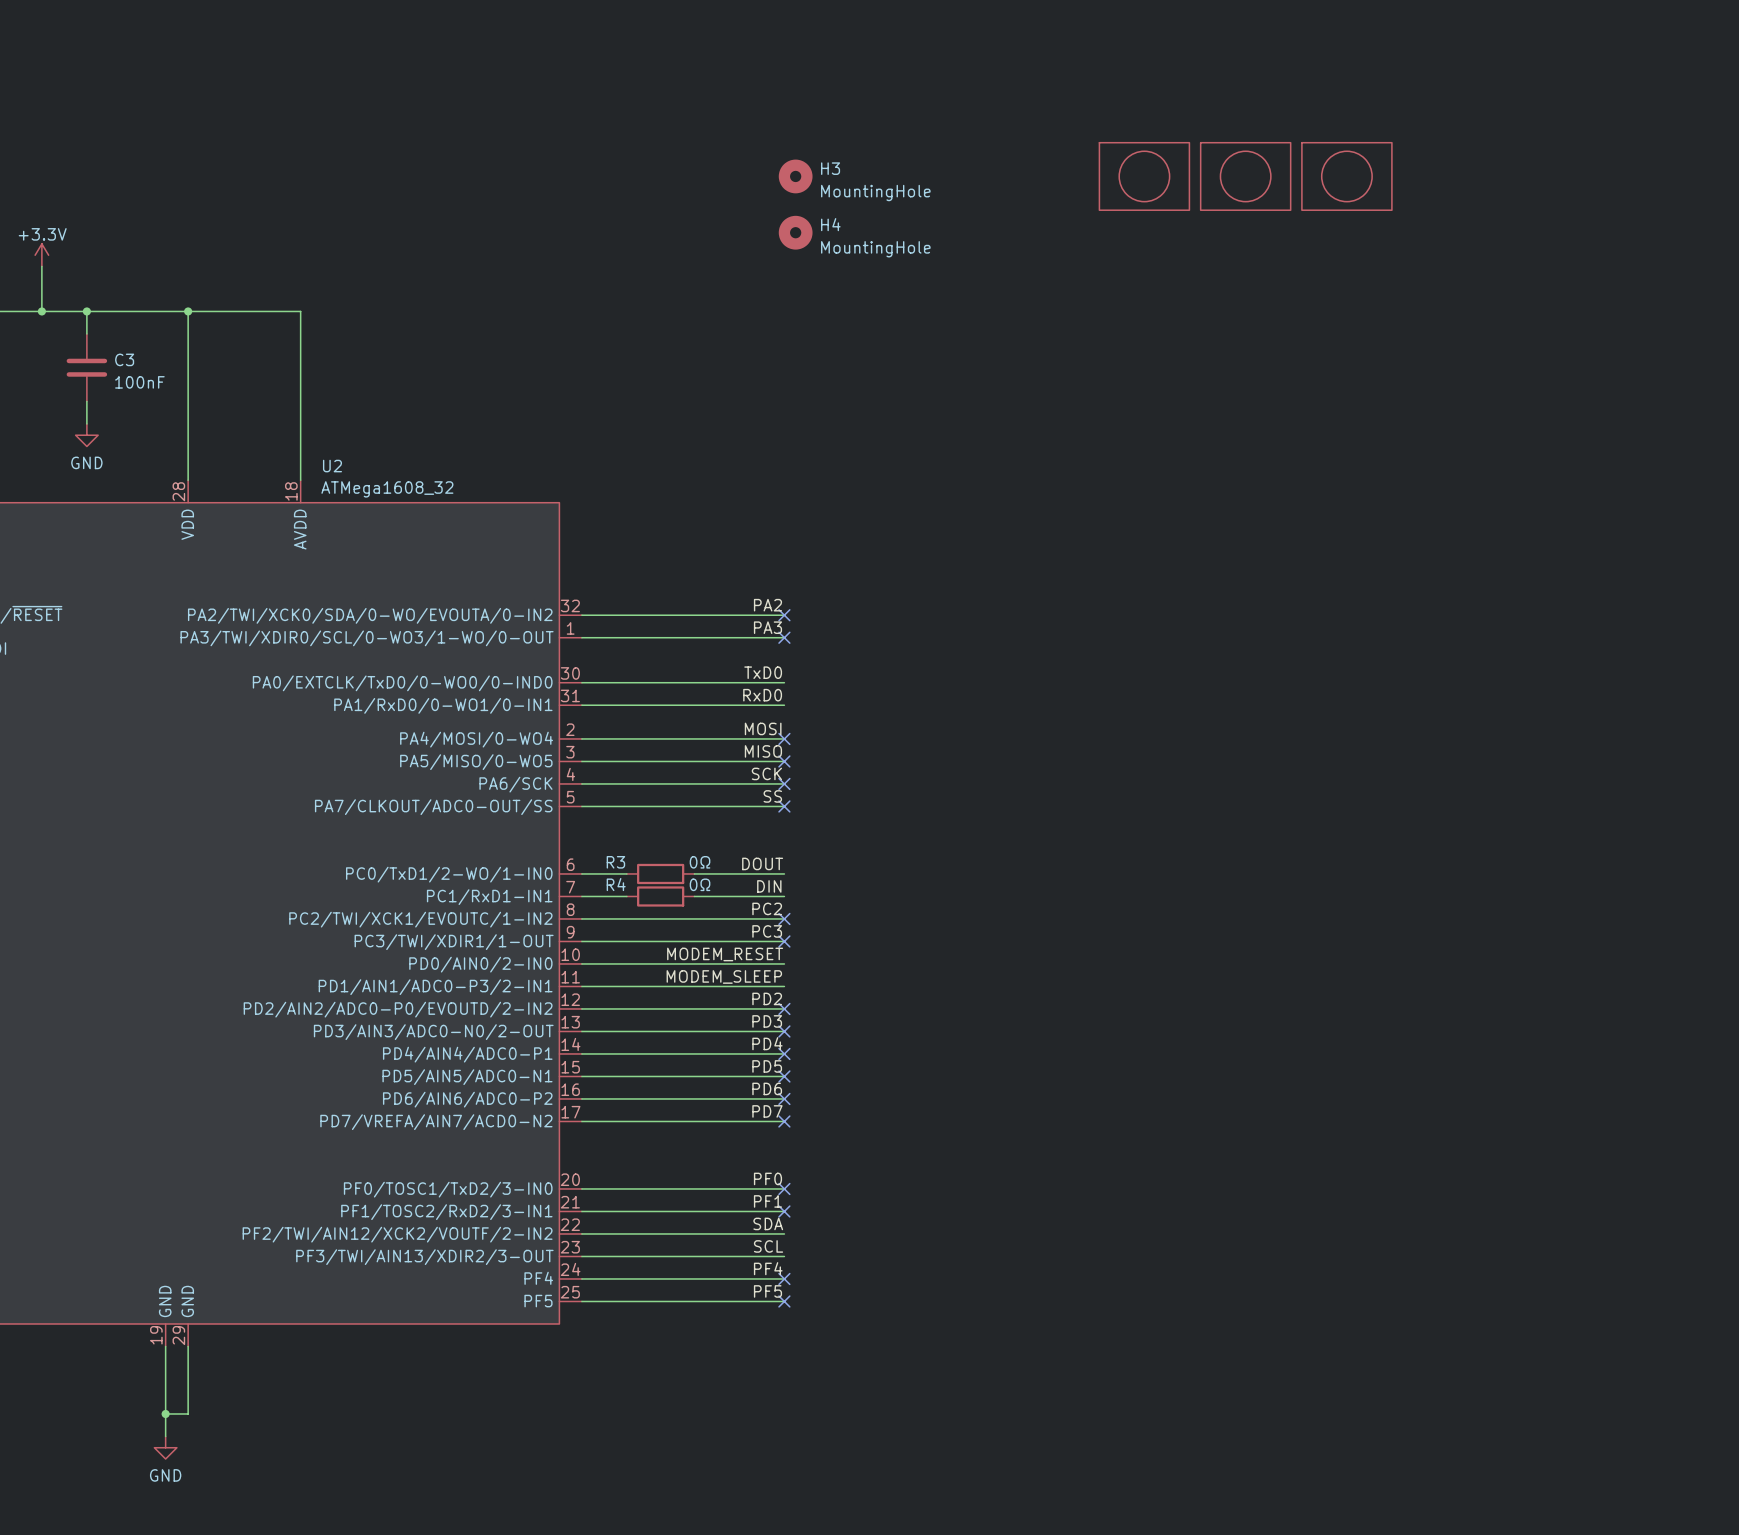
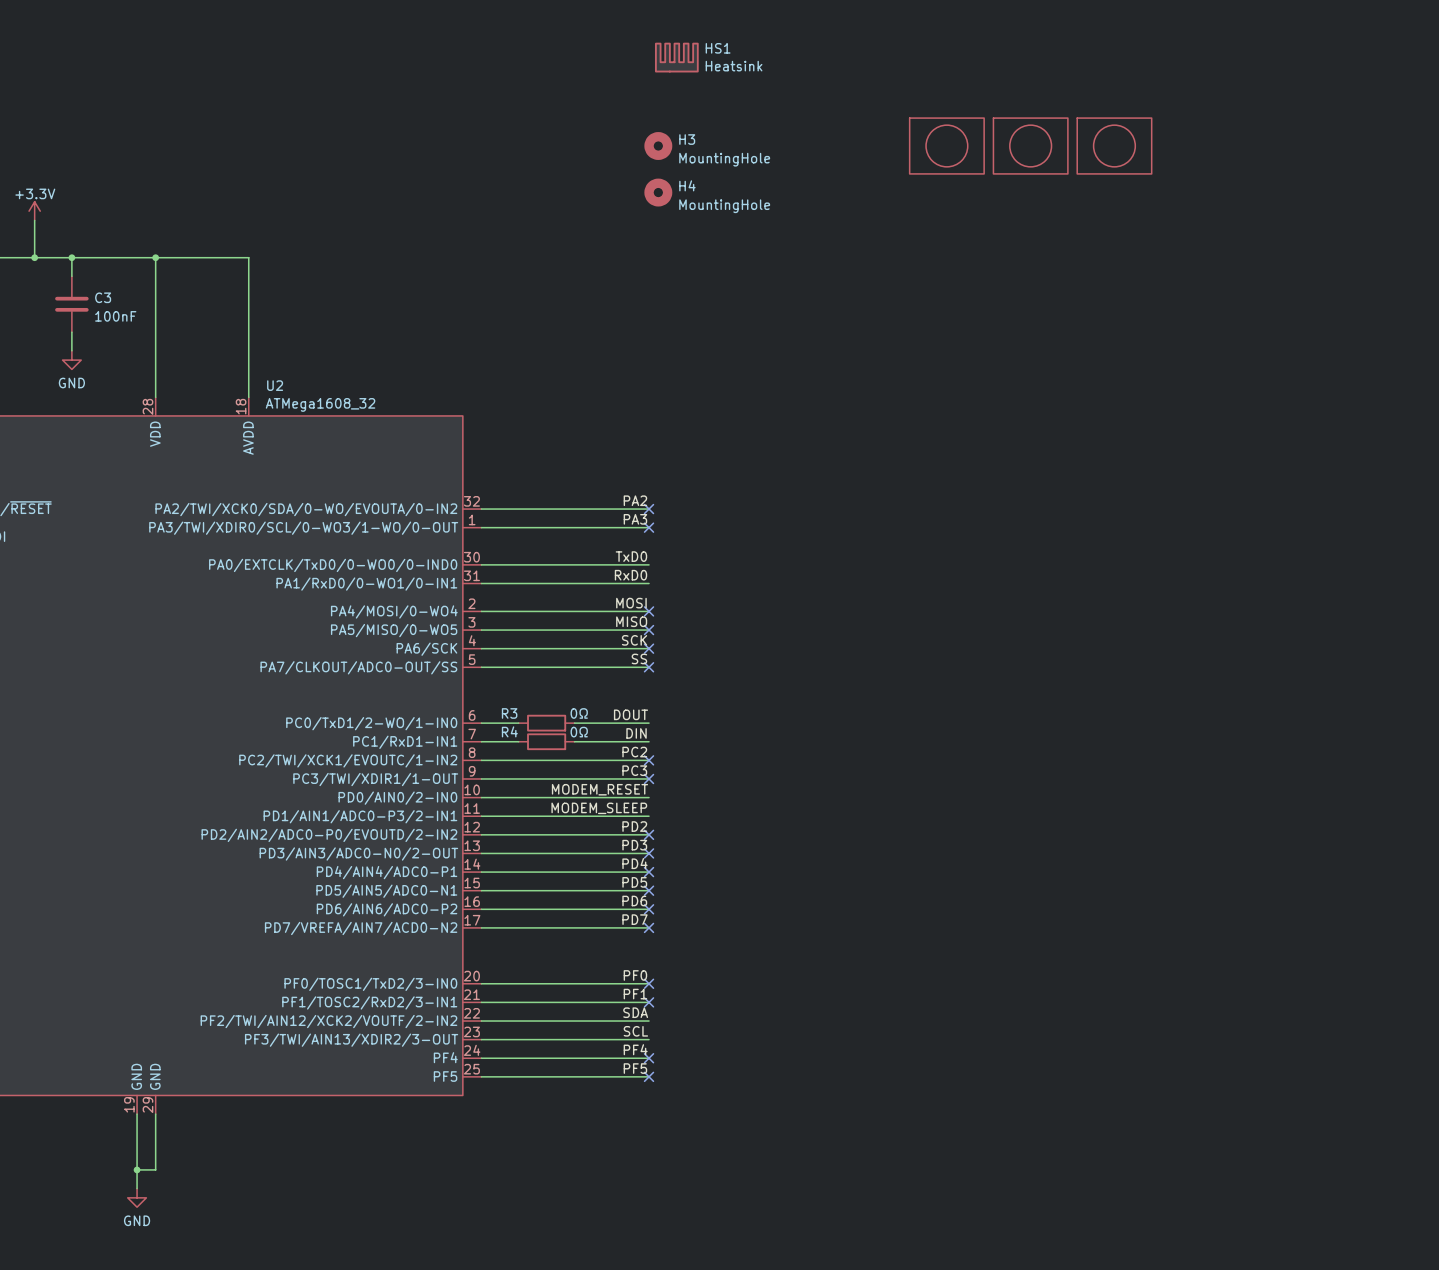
HS1: none -> Heatsink (676, 57)

